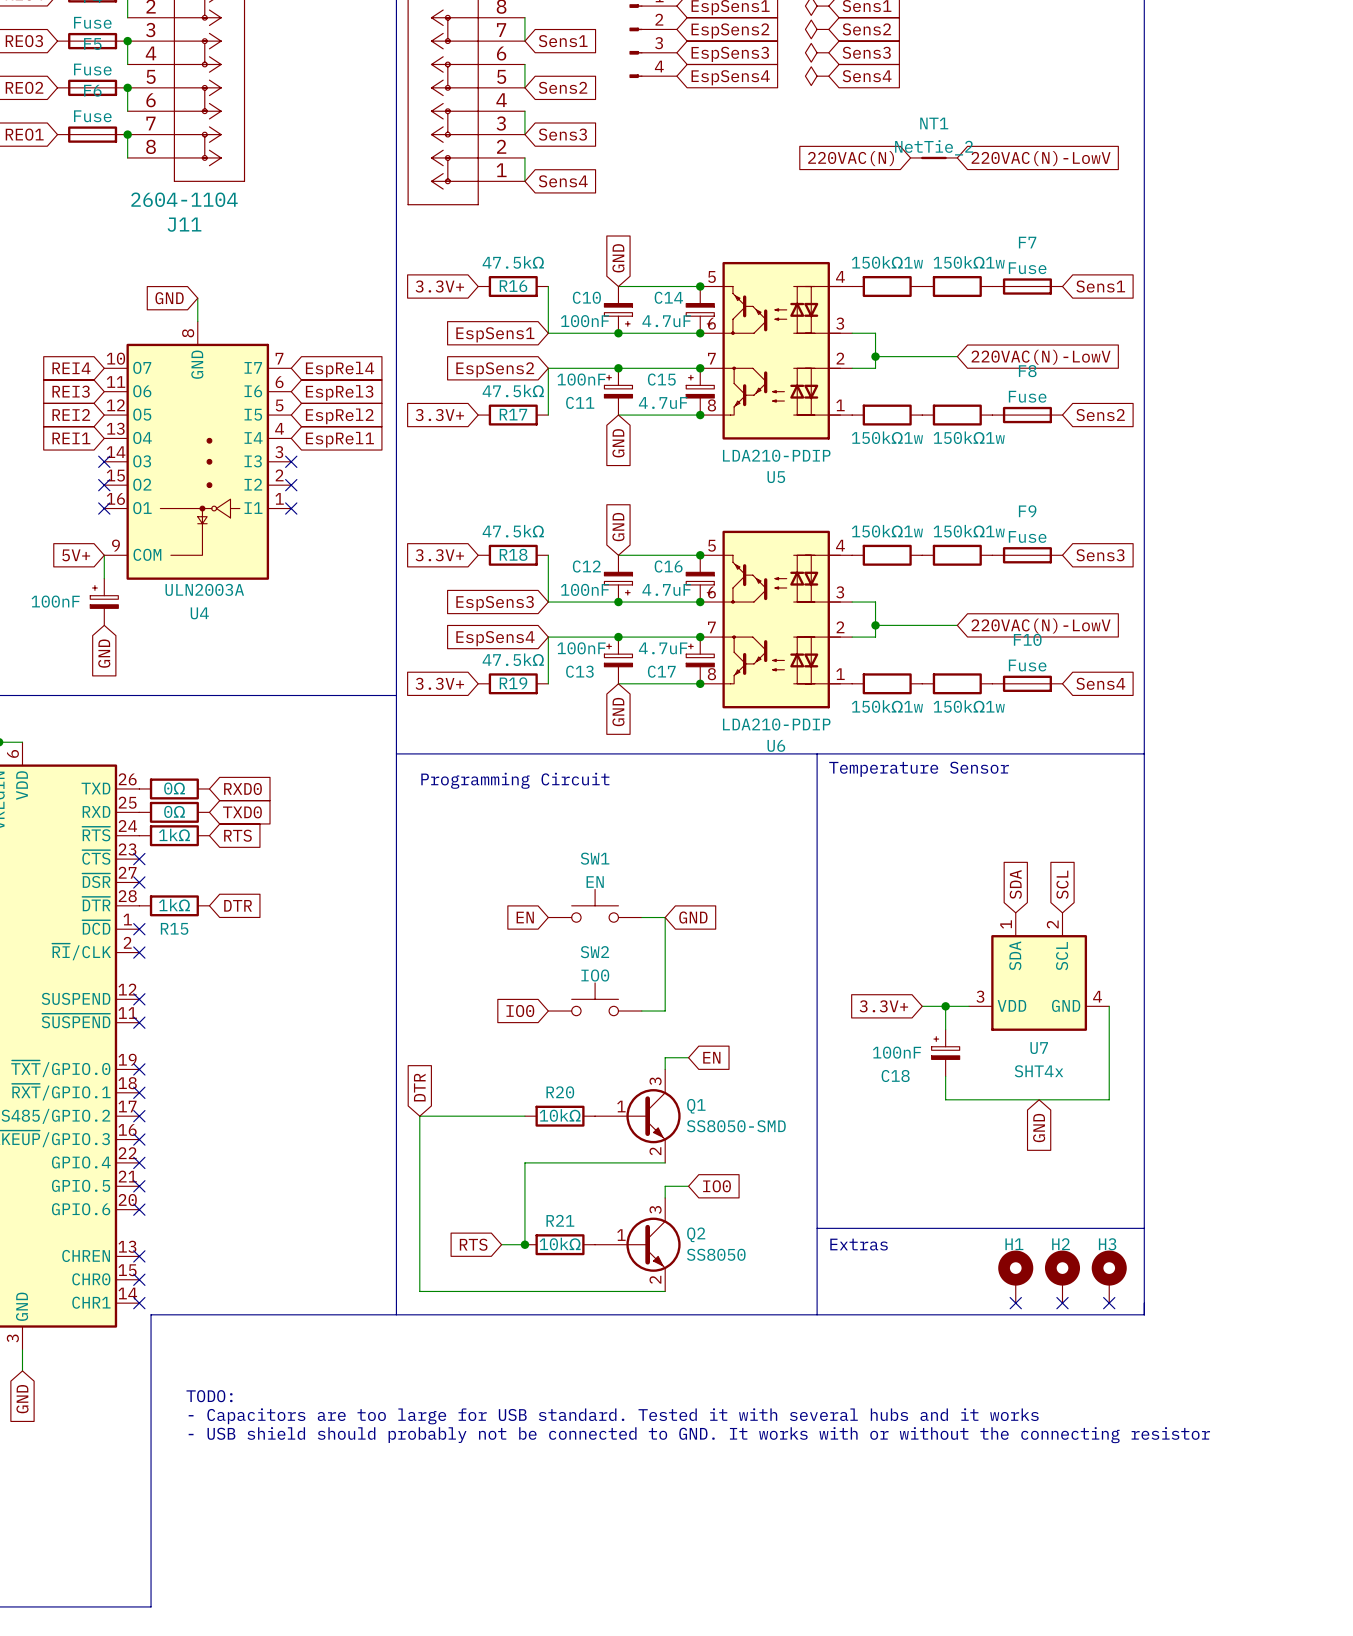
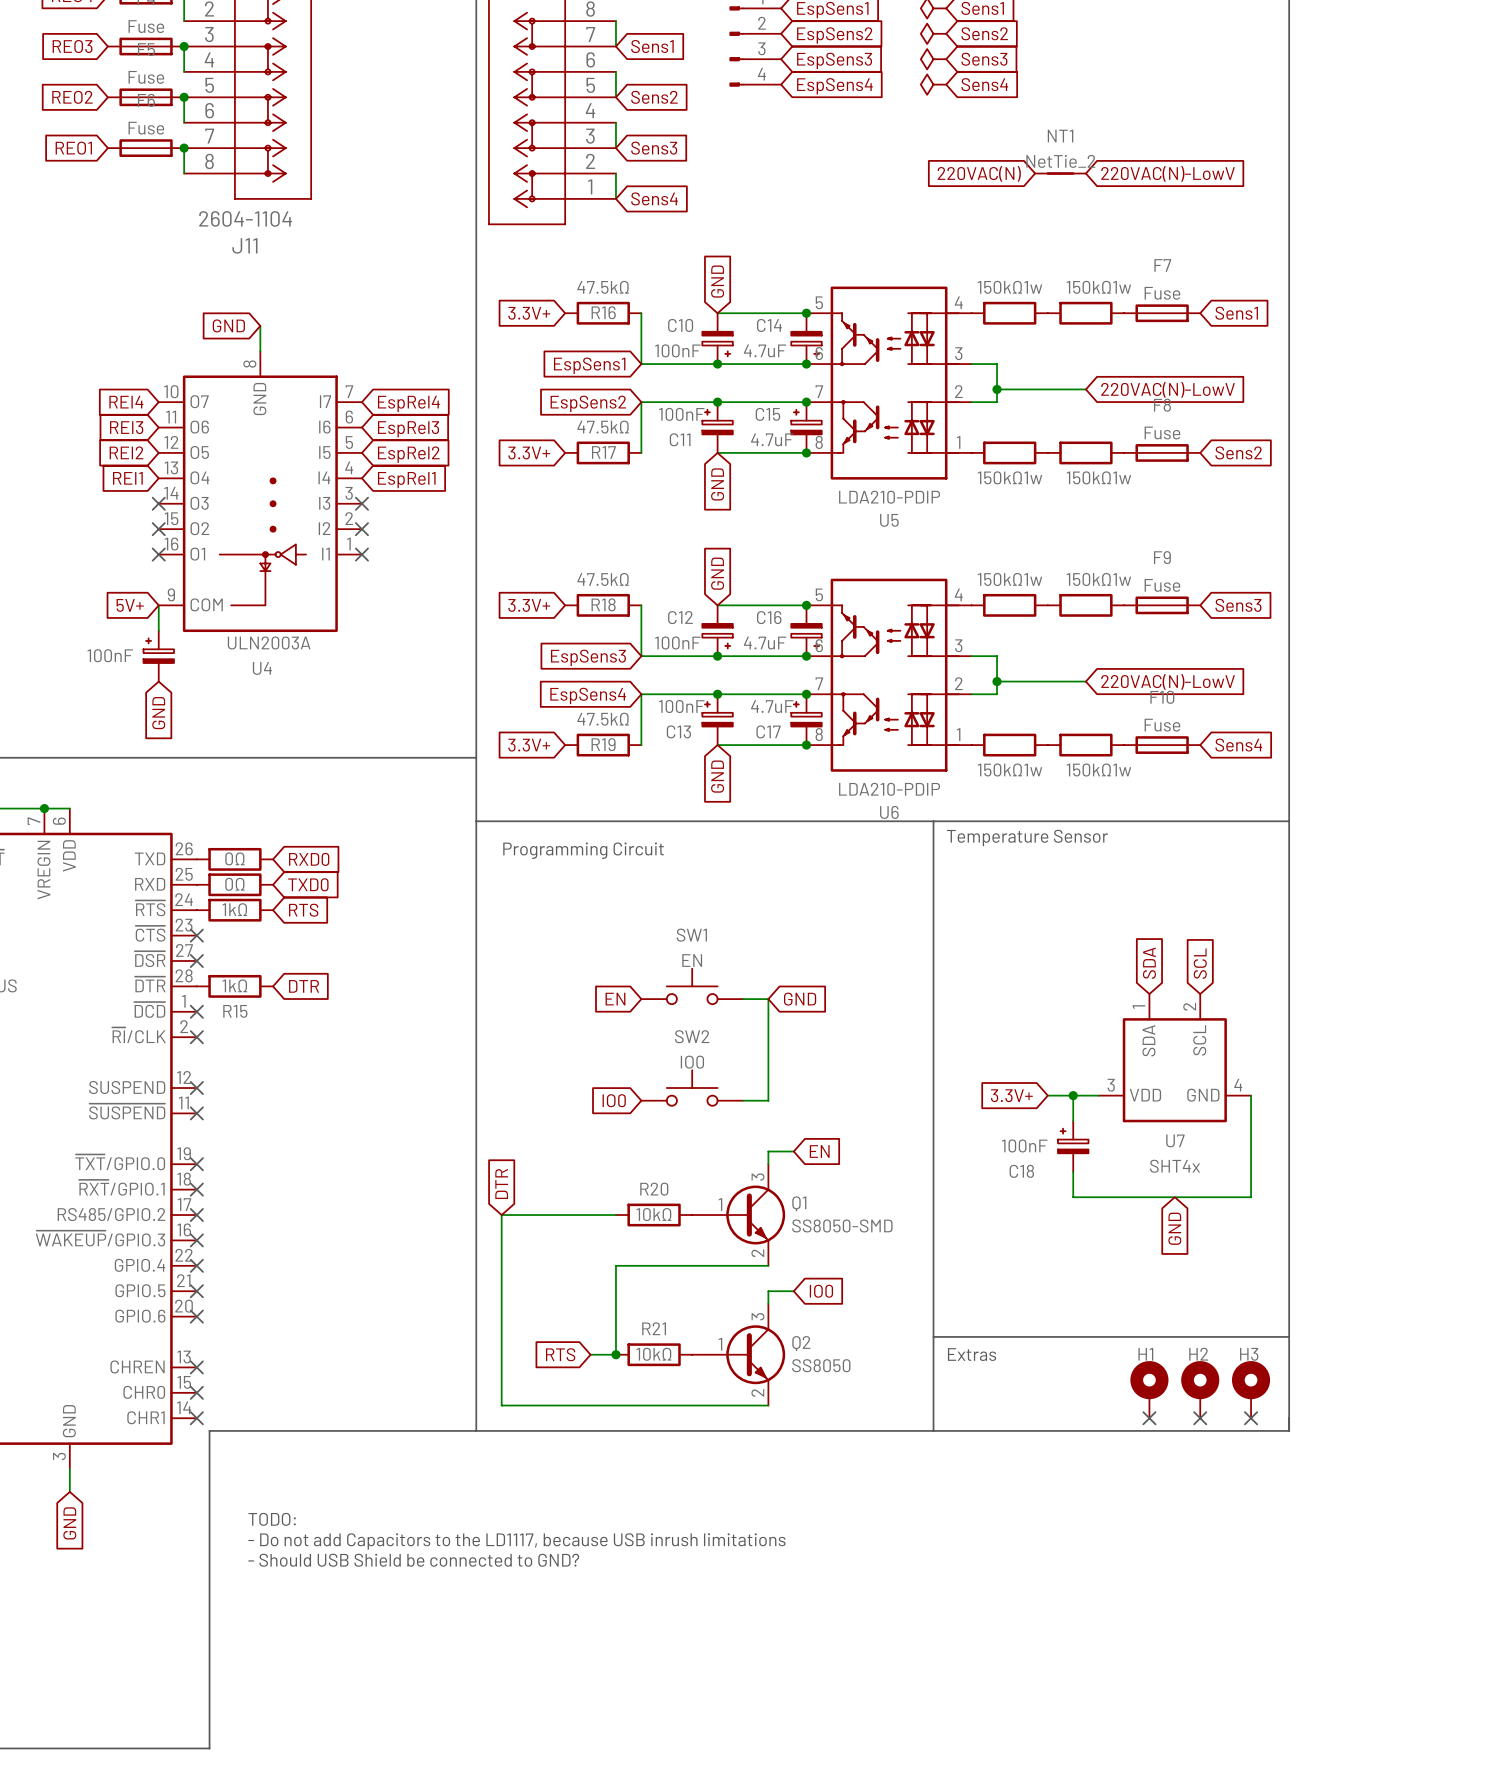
text: - Capacitors are too large for USB standard. Tested it with several hubs and it works (613, 1416) -> - Do not add Capacitors to the LD1117, because USB inrush limitations (516, 1541)
text: - USB shield should probably not be connected to GND. It works with or without the connecting resistor (699, 1435) -> - Should USB Shield be connected to GND? (413, 1560)

